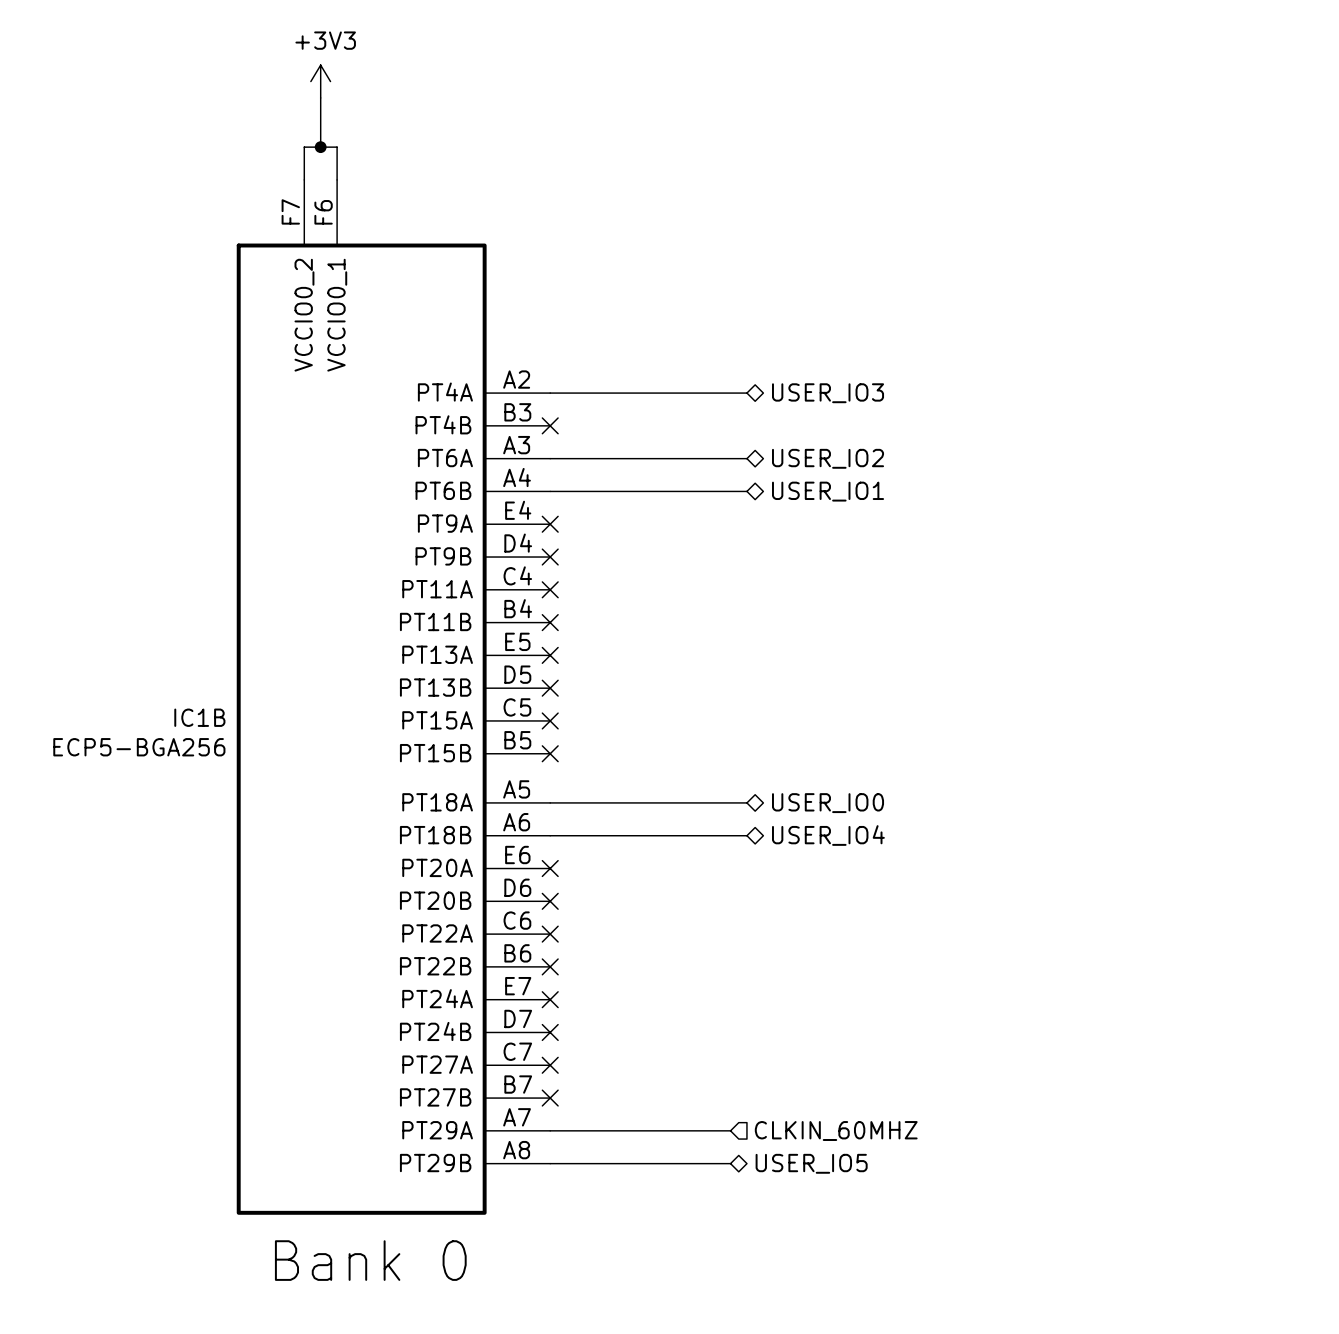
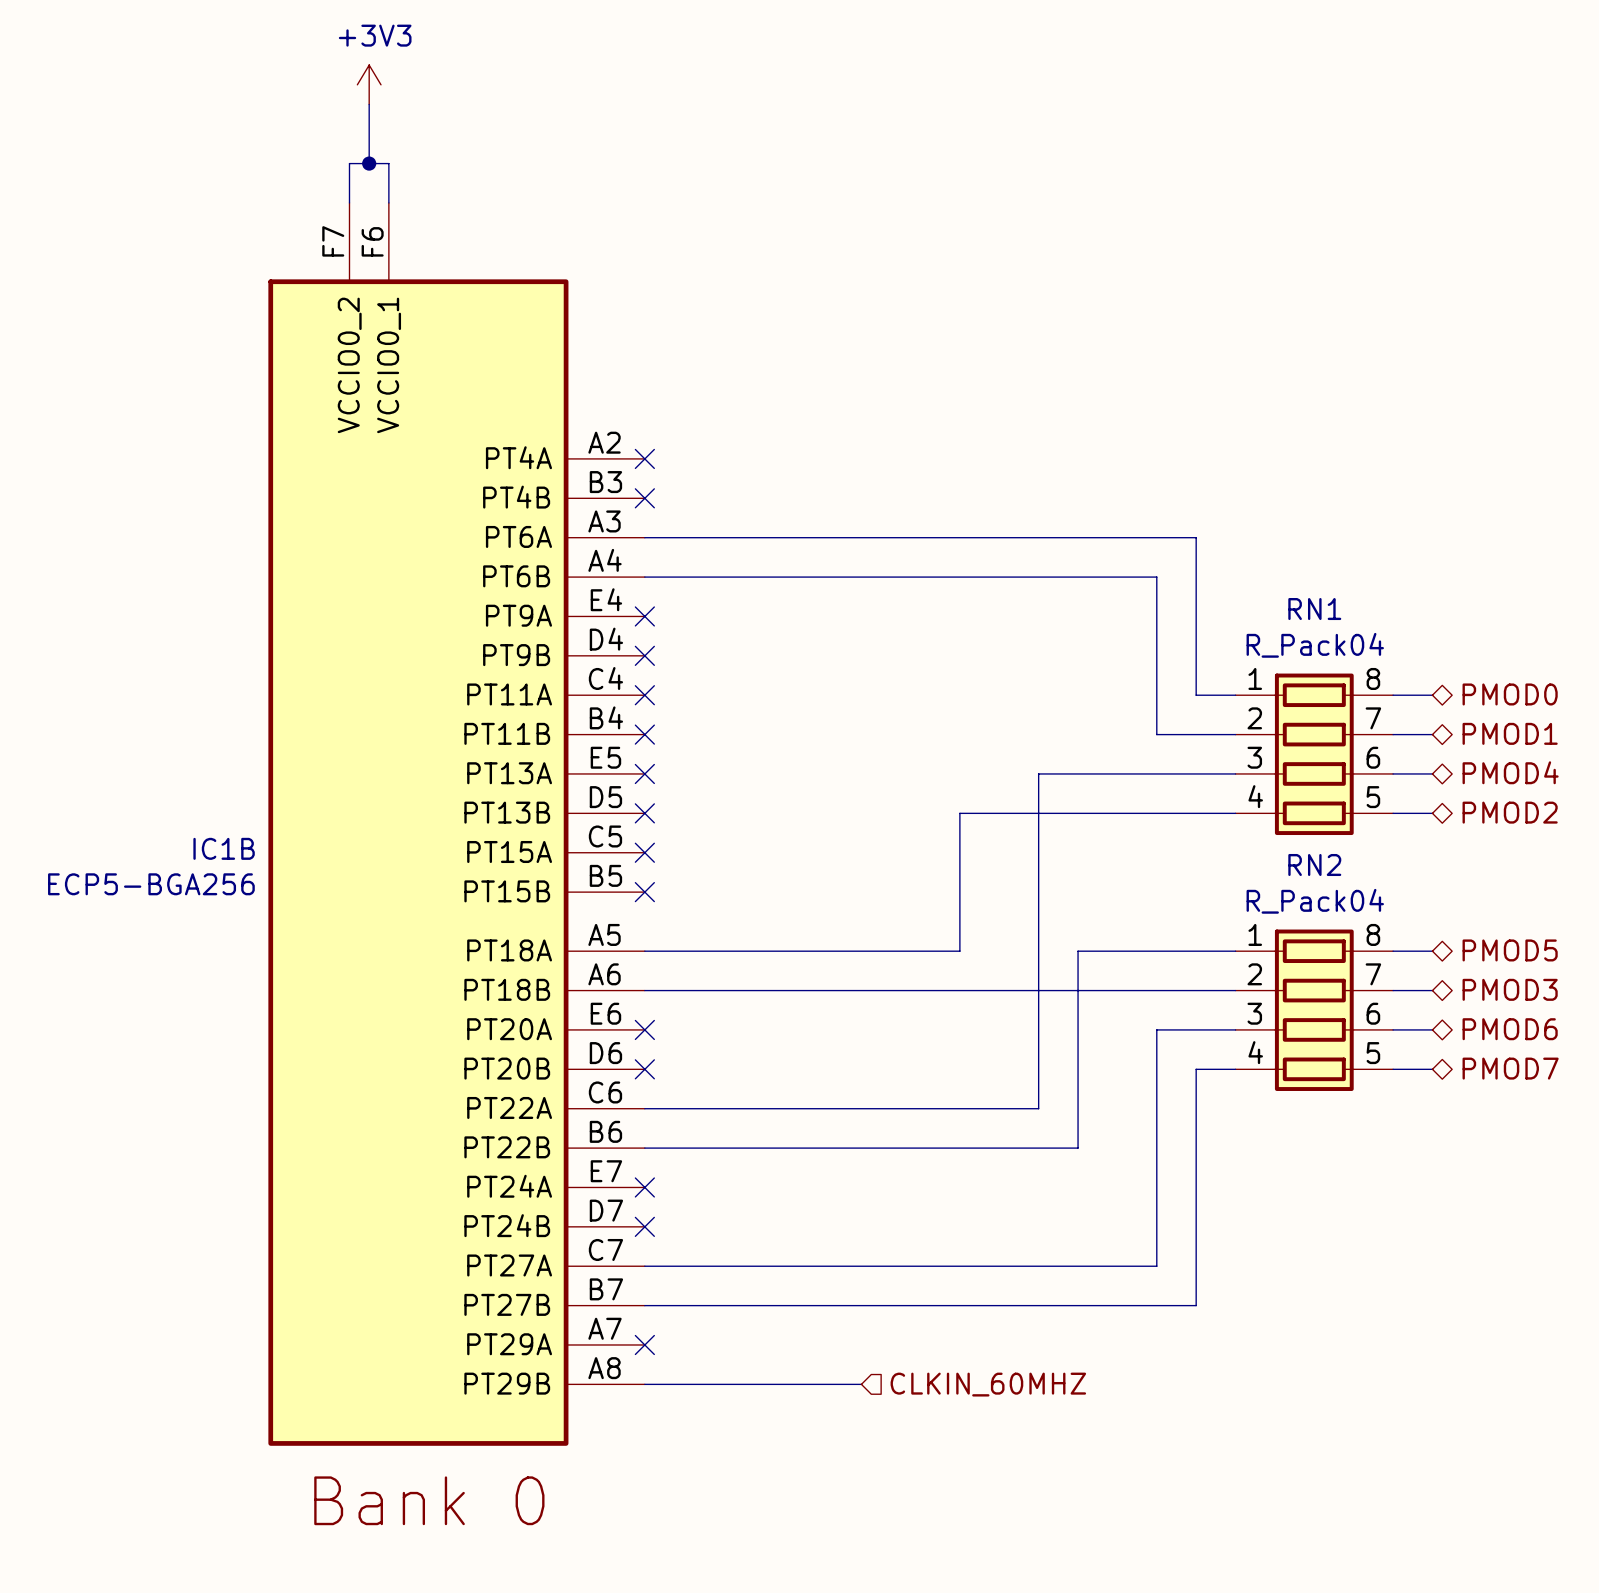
wire: (550, 393) (746, 393) -> none
no-connect mark: none -> (644, 458)
hierarchical label: USER_IO3 (828, 393) -> none
wire: none -> (881, 537) (1196, 537) (1196, 695) (1235, 695)
hierarchical label: USER_IO2 (828, 458) -> none
wire: none -> (881, 577) (1156, 577) (1156, 734) (1235, 734)
hierarchical label: USER_IO1 (828, 491) -> none
wire: none -> (1393, 695) (1432, 695)
hierarchical label: none -> PMOD0 (1510, 694)
hierarchical label: none -> PMOD1 (1510, 733)
wire: none -> (1393, 734) (1432, 734)
RN1: none -> R_Pack04 (1314, 754)
hierarchical label: none -> PMOD4 (1510, 772)
wire: none -> (1235, 773) (1038, 773) (1038, 1108) (644, 1108)
wire: none -> (1393, 773) (1432, 773)
hierarchical label: none -> PMOD2 (1510, 812)
wire: none -> (1235, 813) (959, 813) (959, 951) (881, 951)
wire: none -> (1393, 813) (1432, 813)
wire: none -> (1235, 951) (1078, 951) (1078, 1148) (644, 1148)
wire: none -> (1393, 951) (1432, 951)
hierarchical label: none -> PMOD5 (1510, 950)
hierarchical label: USER_IO0 (828, 803) -> none
wire: none -> (881, 990) (1235, 990)
hierarchical label: USER_IO4 (828, 835) -> none
wire: none -> (1393, 990) (1432, 990)
hierarchical label: none -> PMOD3 (1510, 989)
RN2: none -> R_Pack04 (1314, 1010)
hierarchical label: none -> PMOD6 (1510, 1029)
wire: none -> (1235, 1029) (1156, 1029) (1156, 1266) (644, 1266)
wire: none -> (1393, 1029) (1432, 1029)
hierarchical label: none -> PMOD7 (1510, 1068)
wire: none -> (1235, 1069) (1196, 1069) (1196, 1305) (644, 1305)
wire: none -> (1393, 1069) (1432, 1069)
no-connect mark: (550, 934) -> none
no-connect mark: (550, 966) -> none
no-connect mark: (550, 1065) -> none
no-connect mark: (550, 1098) -> none
wire: (550, 1130) (730, 1130) -> none
no-connect mark: none -> (644, 1344)
hierarchical label: CLKIN_60MHZ (836, 1131) -> none
hierarchical label shape: bidirectional (811, 1163) -> input (988, 1384)
hierarchical label: USER_IO5 (811, 1163) -> CLKIN_60MHZ (988, 1384)

